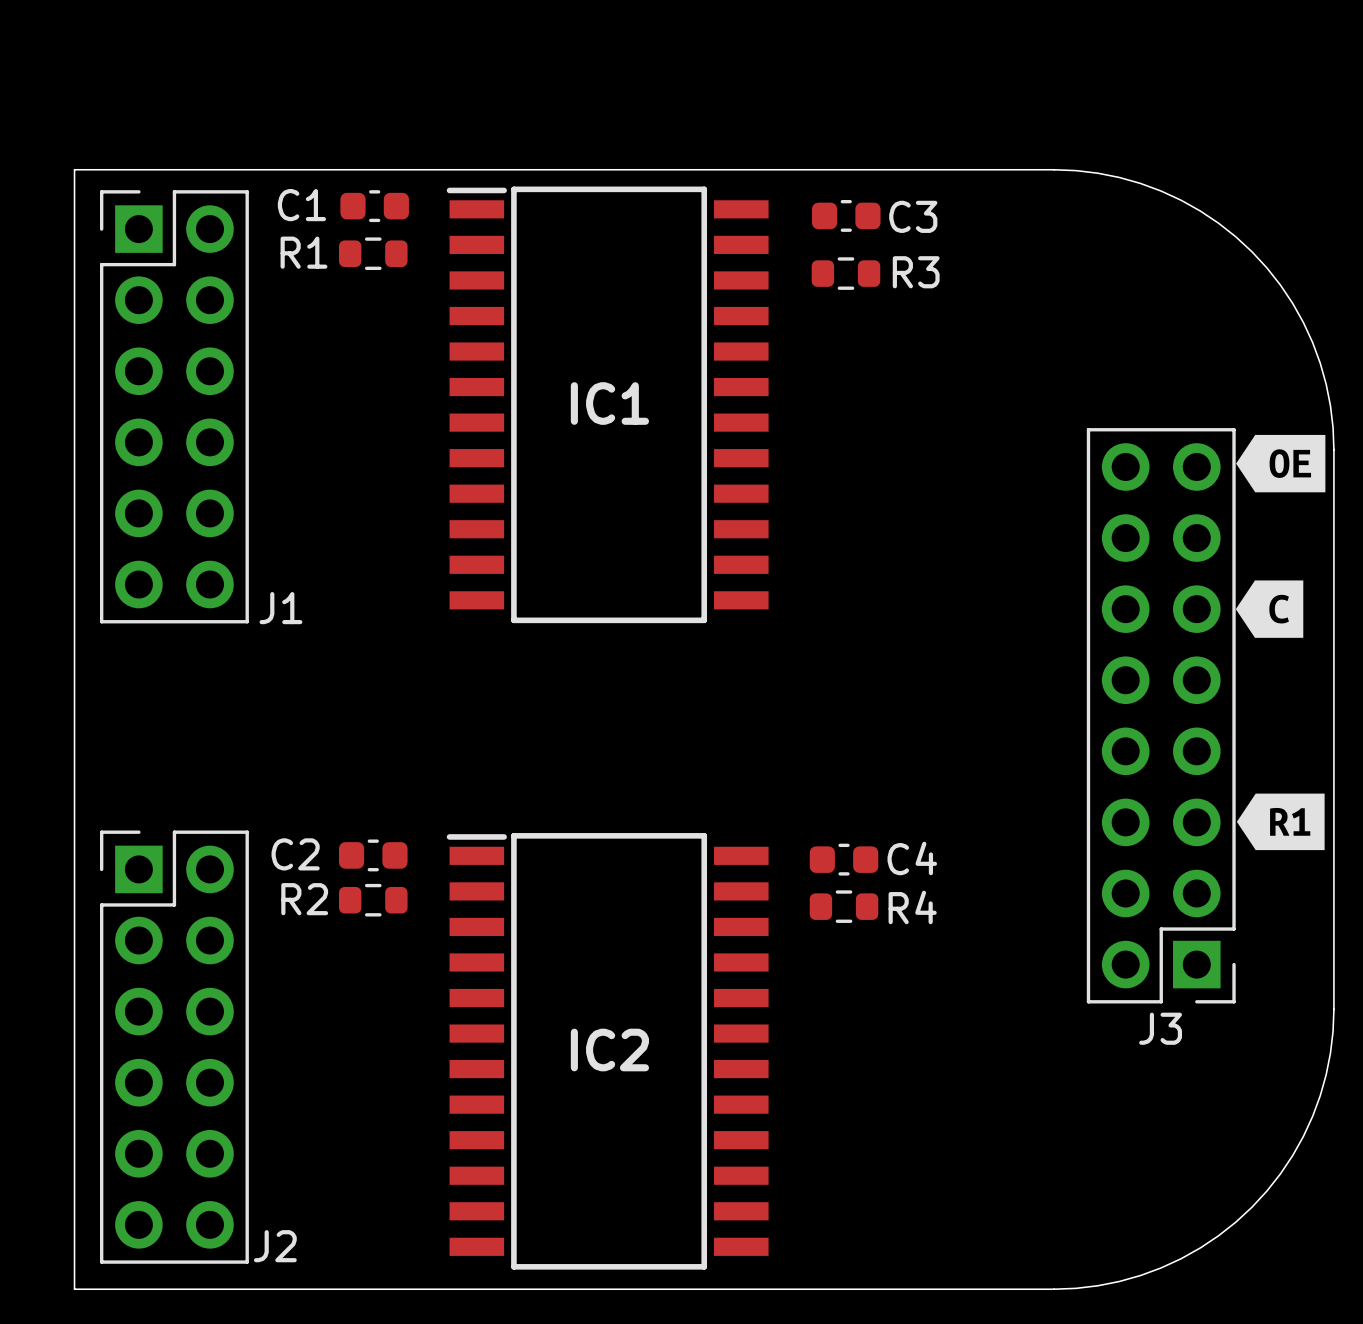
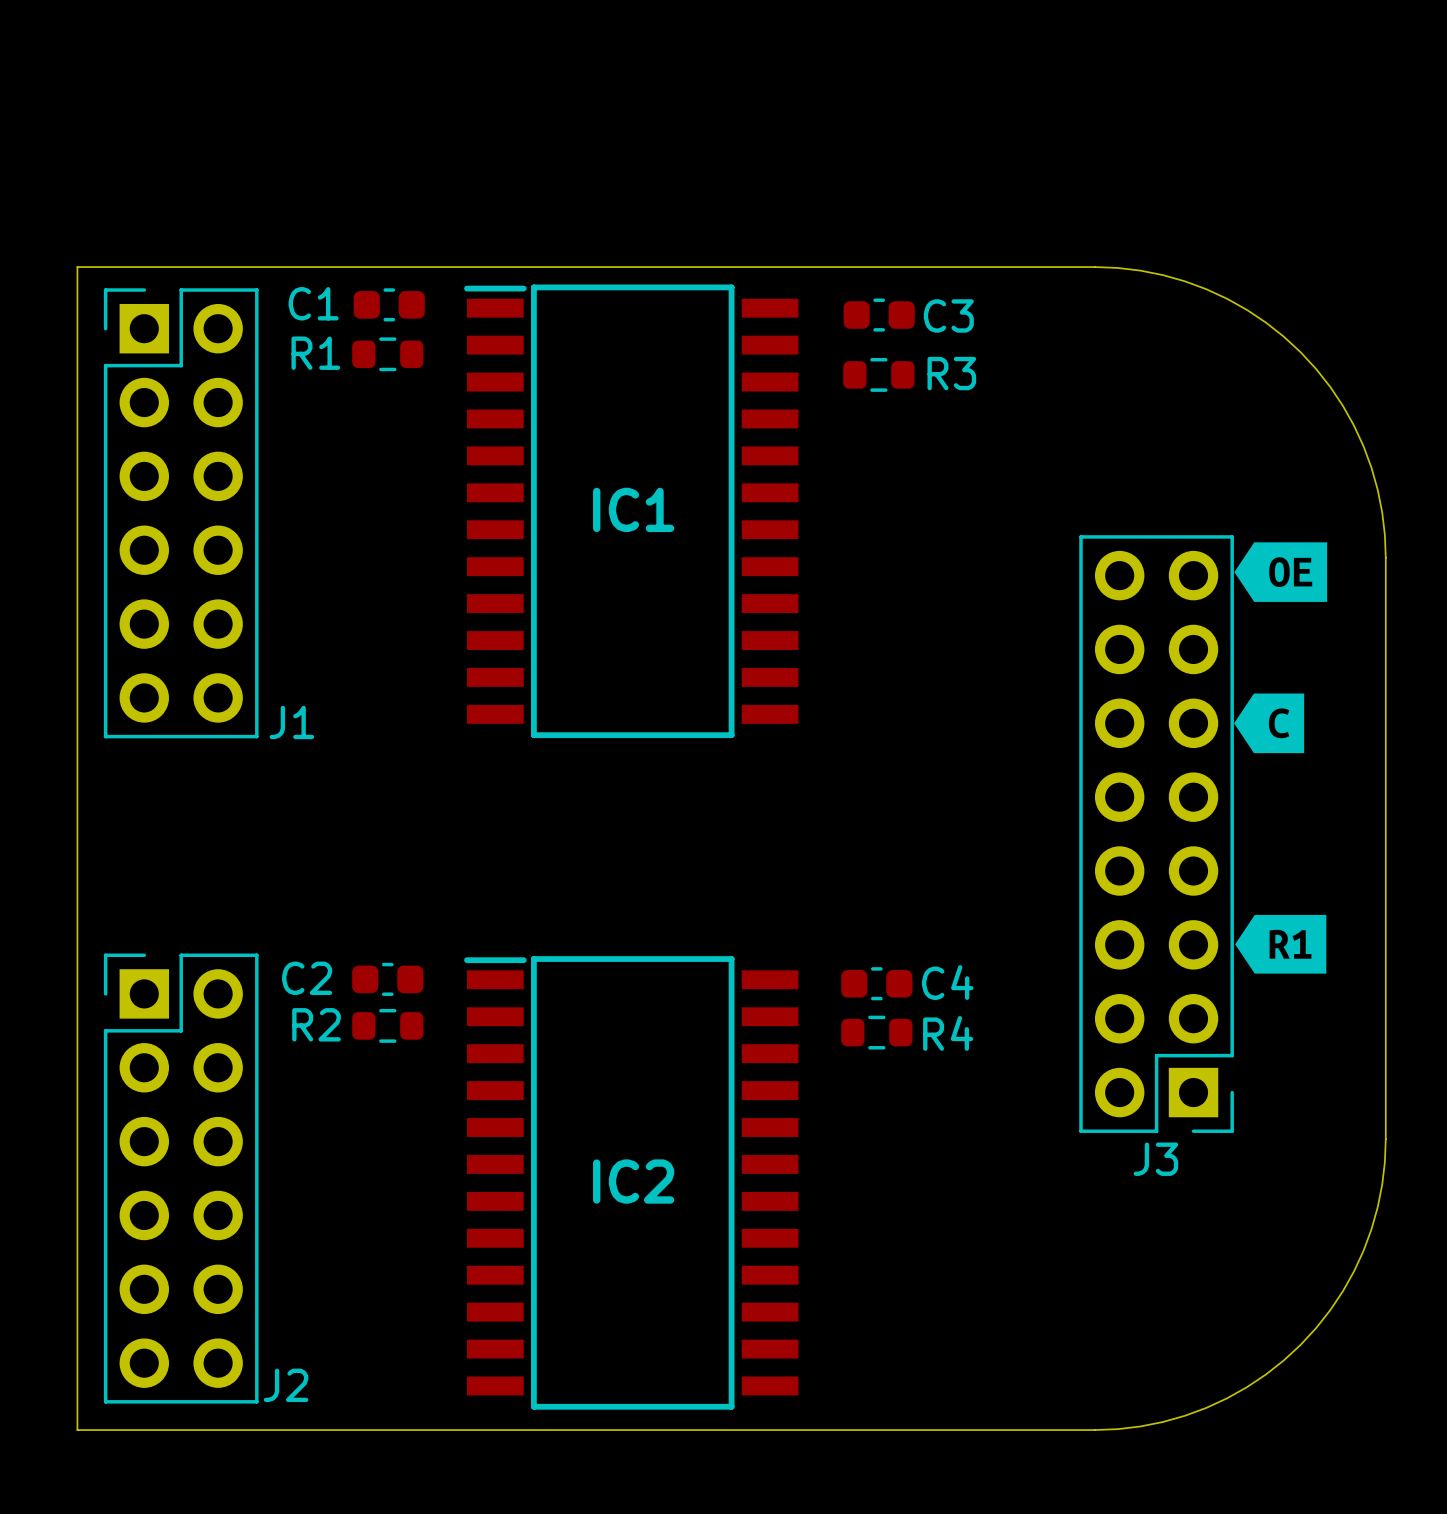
drawing position: (1280, 463) -> (1280, 572)
drawing position: (1269, 609) -> (1269, 723)
J3 position: (1161, 715) -> (1156, 834)
drawing position: (1280, 821) -> (1280, 944)

